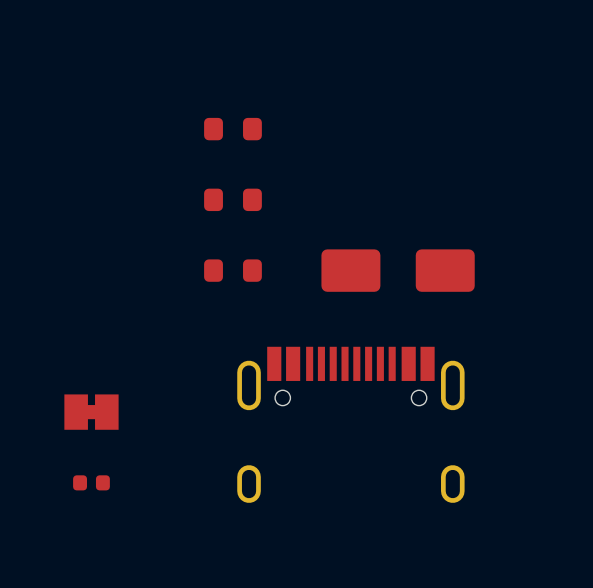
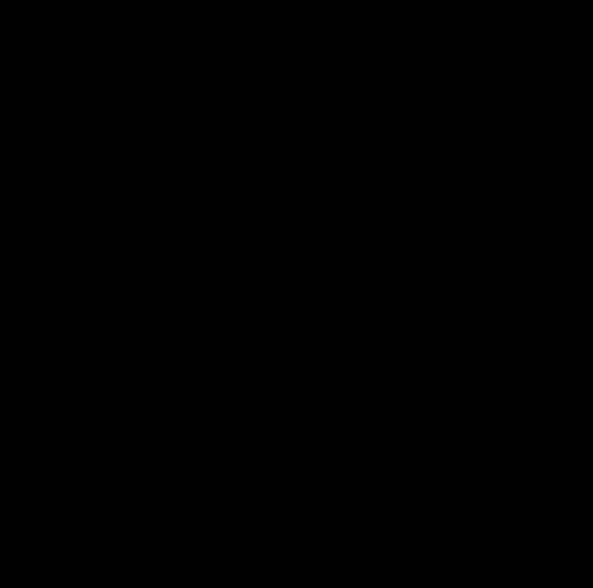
part: (232, 129) -> none
part: (232, 199) -> none
part: (232, 270) -> none
part: (398, 270) -> none
part: (91, 412) -> none
part: (350, 424) -> none
part: (91, 482) -> none

